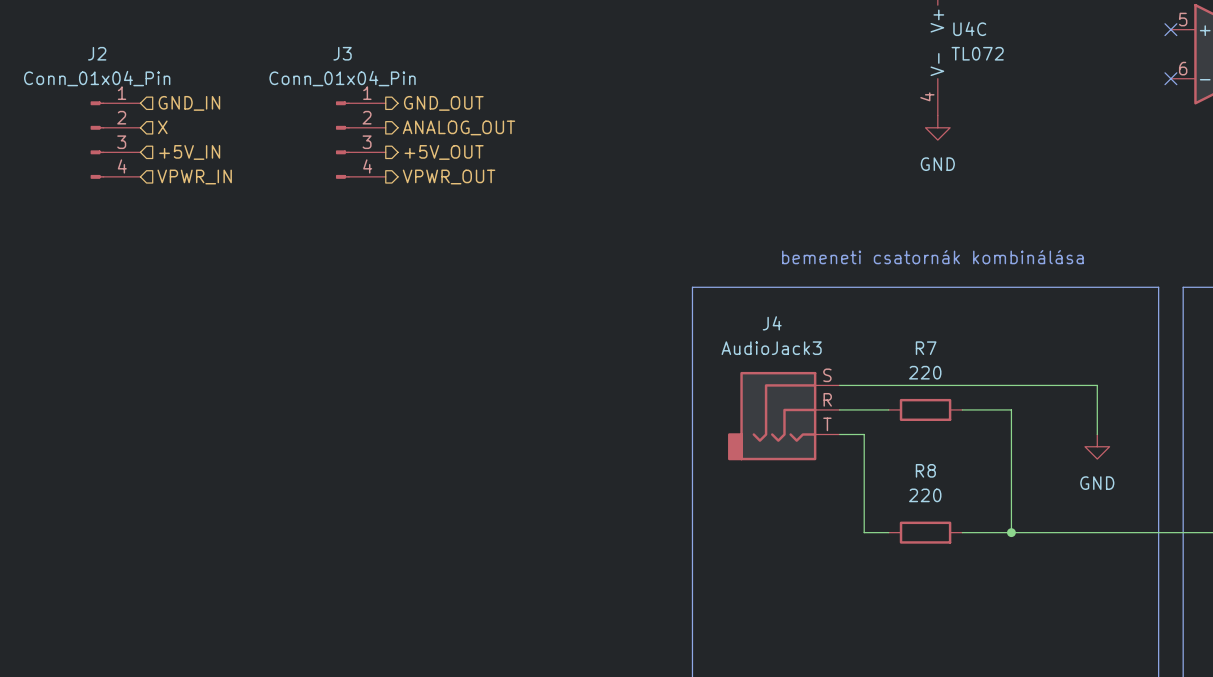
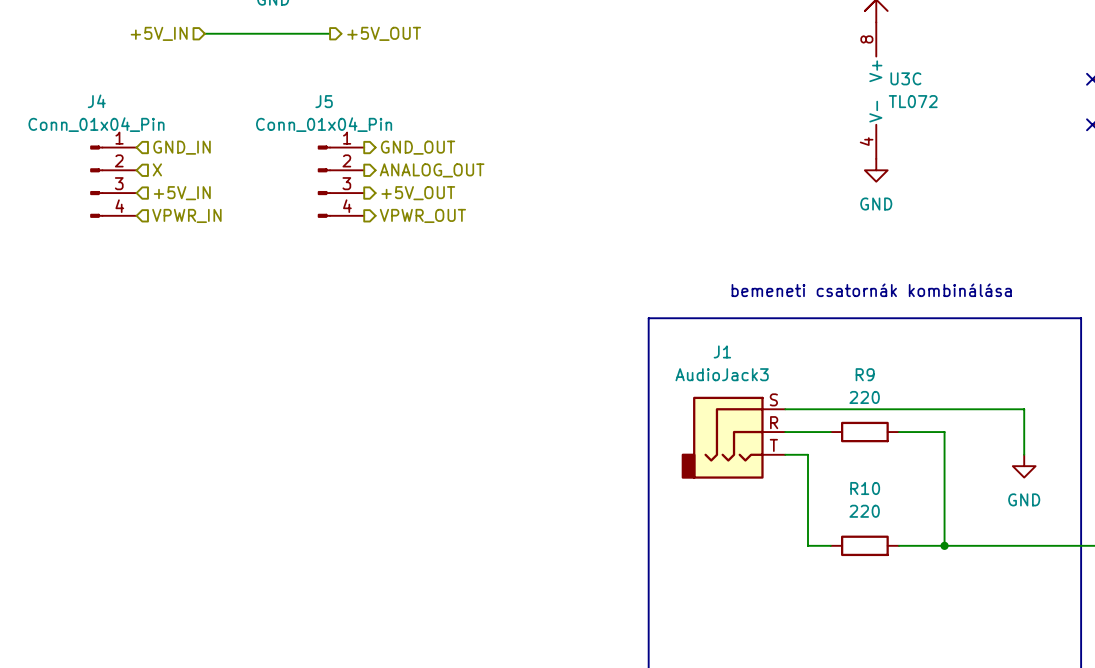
U4C name: U4C (969, 28) -> U3C (905, 78)
J2 name: J2 (97, 53) -> J4 (96, 101)
J3 name: J3 (342, 53) -> J5 (324, 101)
J4 name: J4 (772, 323) -> J1 (722, 351)
R7 name: R7 (926, 348) -> R9 (865, 374)
R8 name: R8 (925, 470) -> R10 (865, 488)

